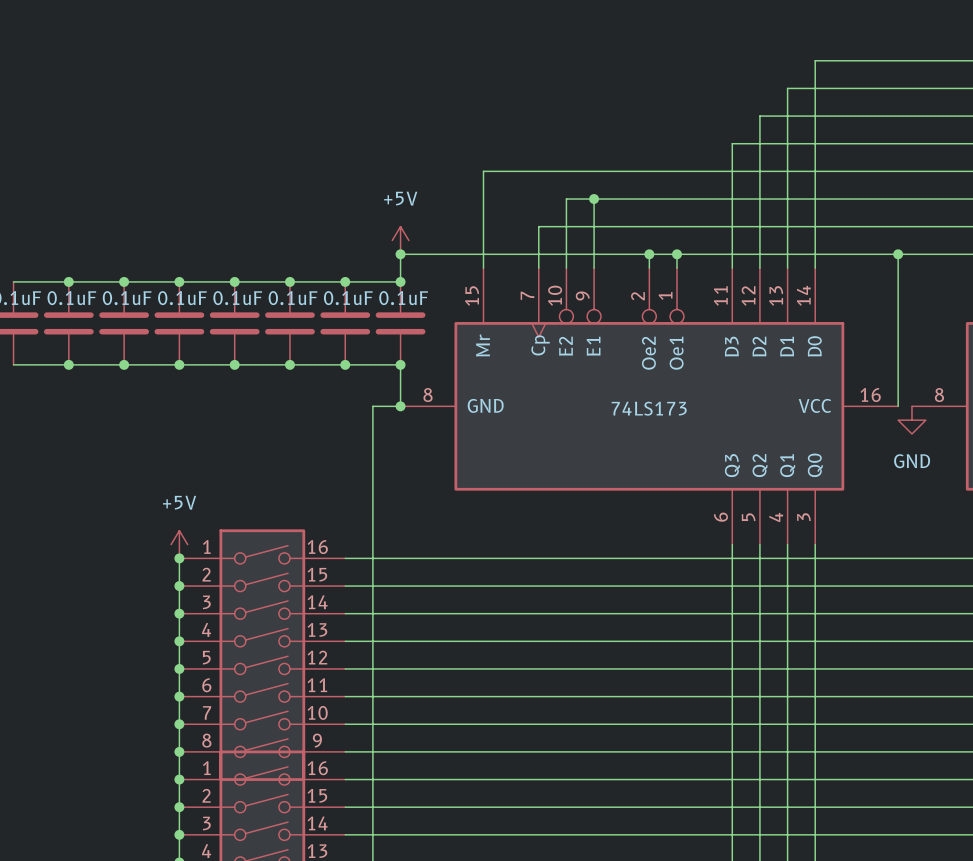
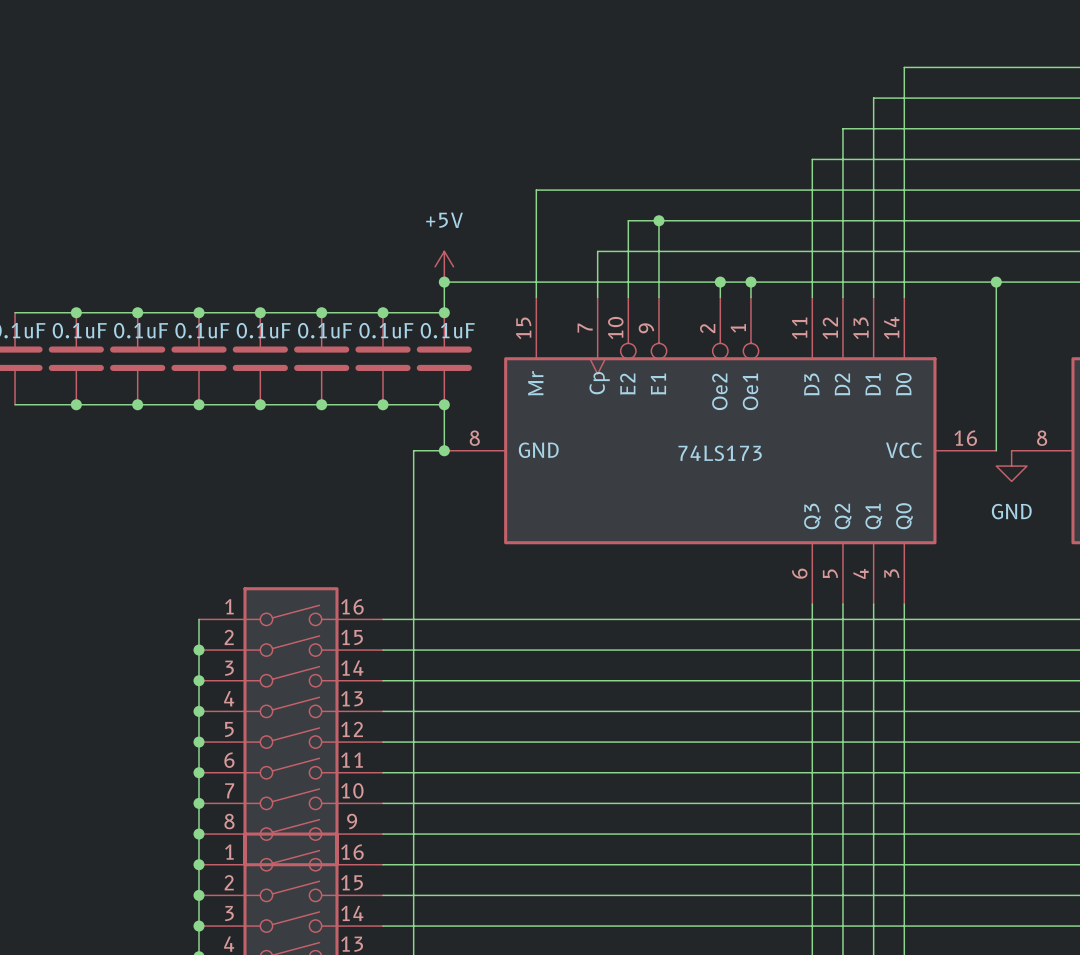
power symbol: +5V (179, 544) -> none
junction: (179, 558) -> none

